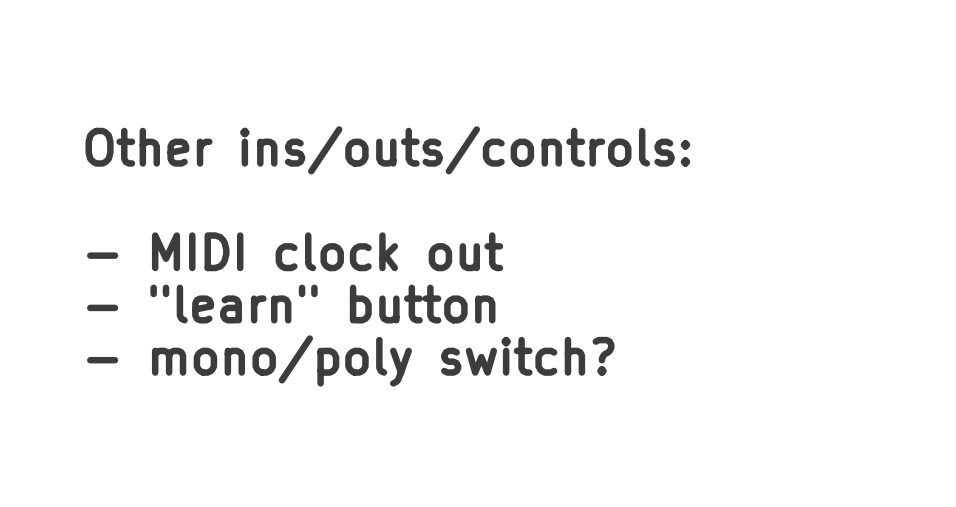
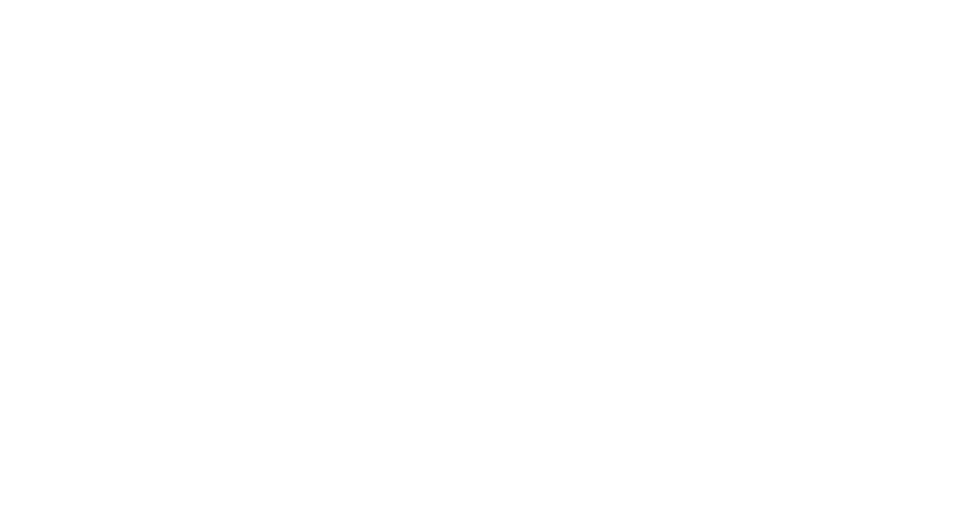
text: Other ins/outs/controls: (387, 150) -> none
text: - MIDI clock out (295, 251) -> none
text: - "learn" button (291, 304) -> none
text: - mono/poly switch? (350, 360) -> none

